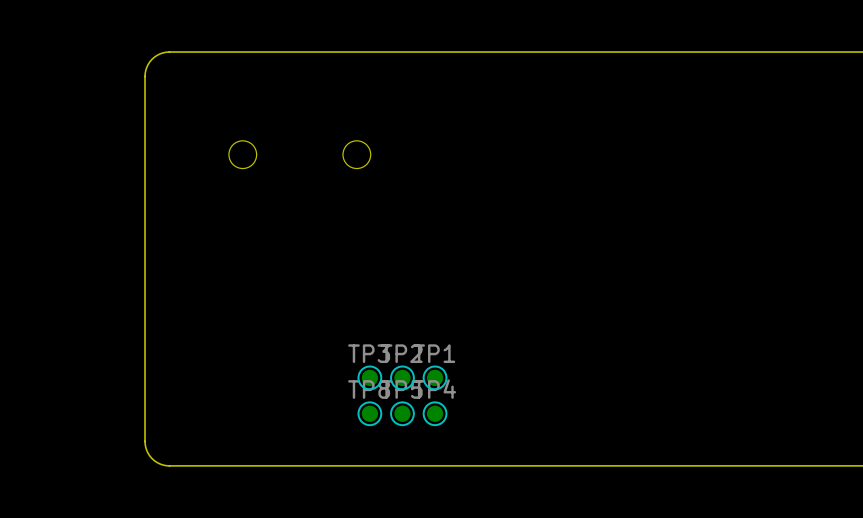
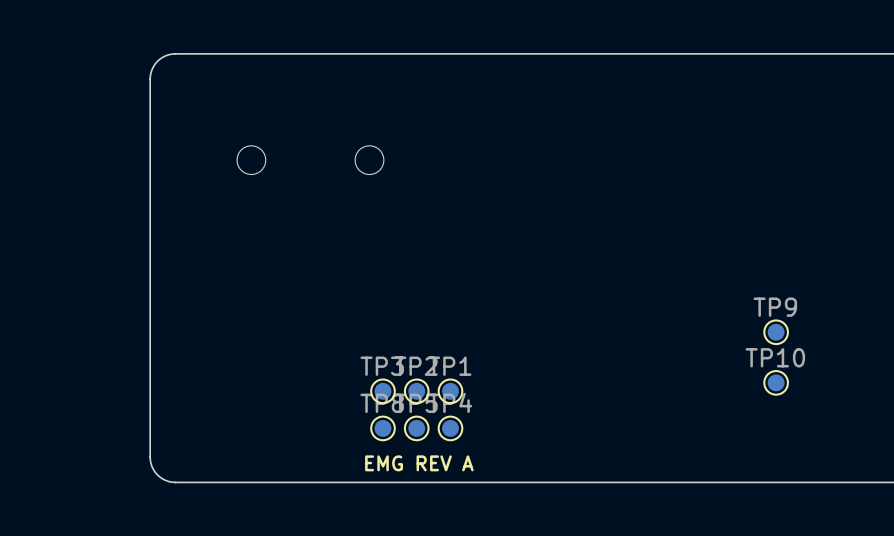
TP9: none -> (776, 332)
TP10: none -> (776, 382)
text: none -> EMG REV A (419, 463)

